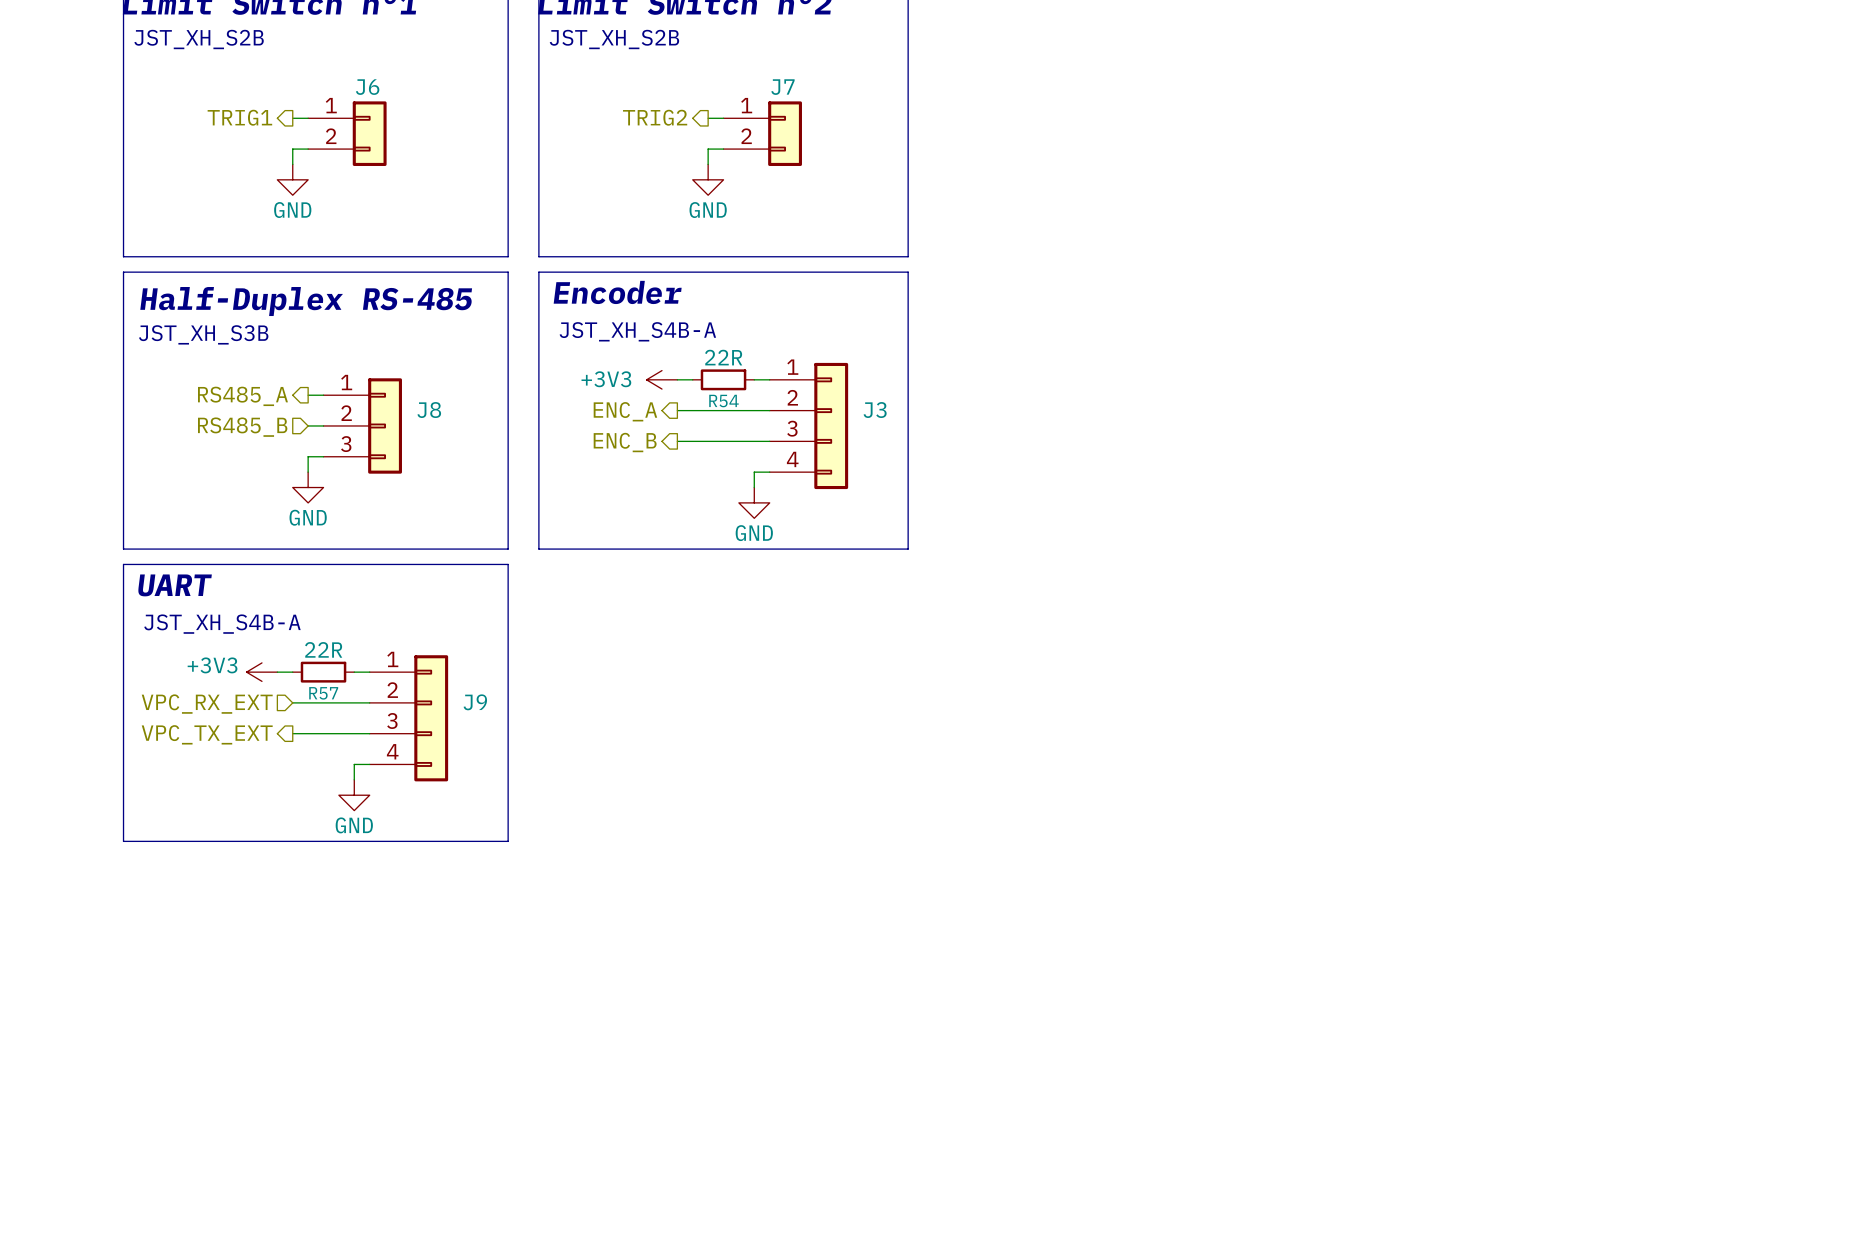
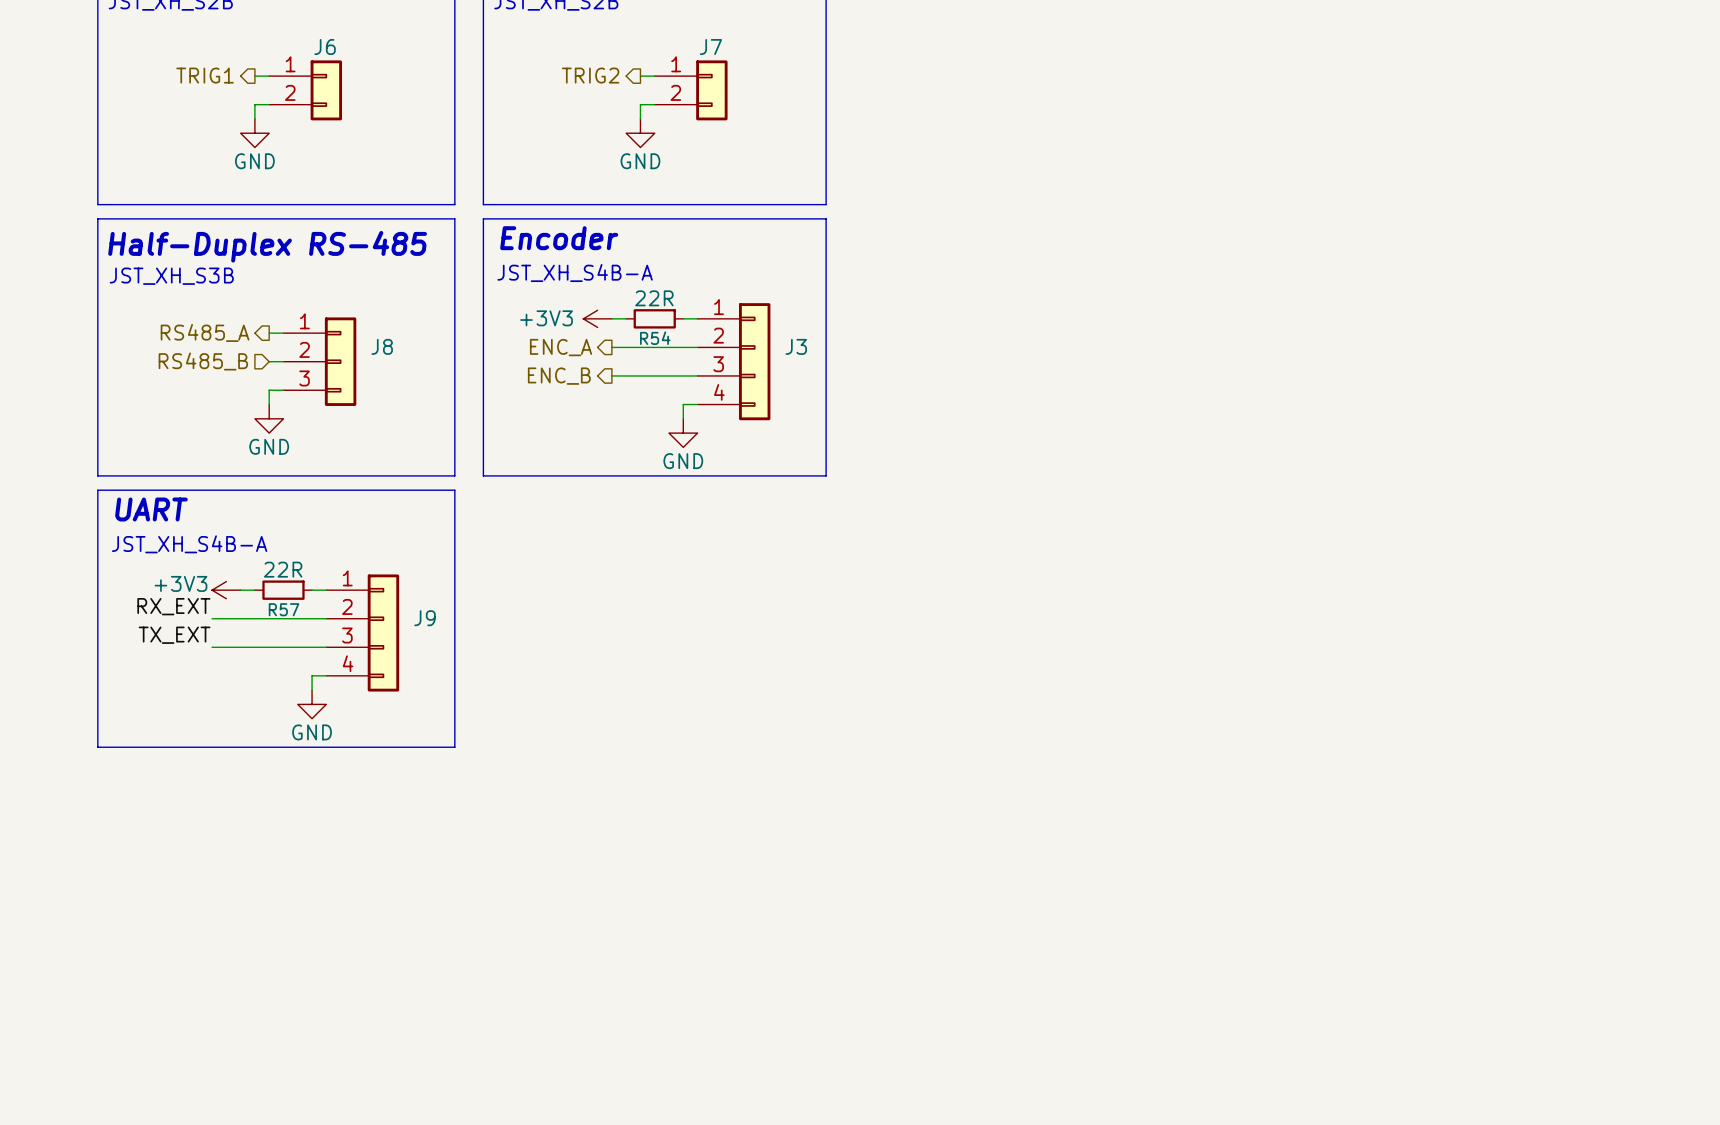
label: none -> RX_EXT (173, 606)
wire: none -> (212, 618) (254, 618)
hierarchical label: VPC_RX_EXT (207, 704) -> none
label: none -> TX_EXT (174, 635)
wire: none -> (212, 647) (254, 647)
hierarchical label: VPC_TX_EXT (207, 734) -> none

